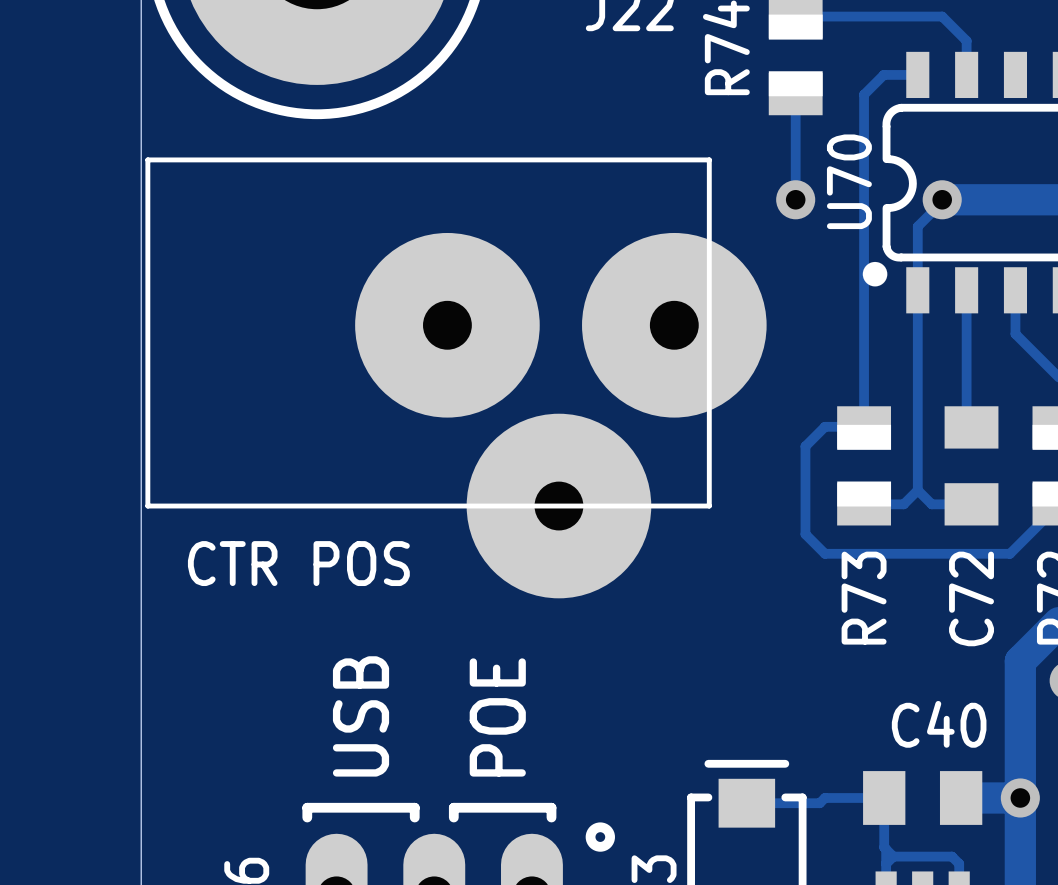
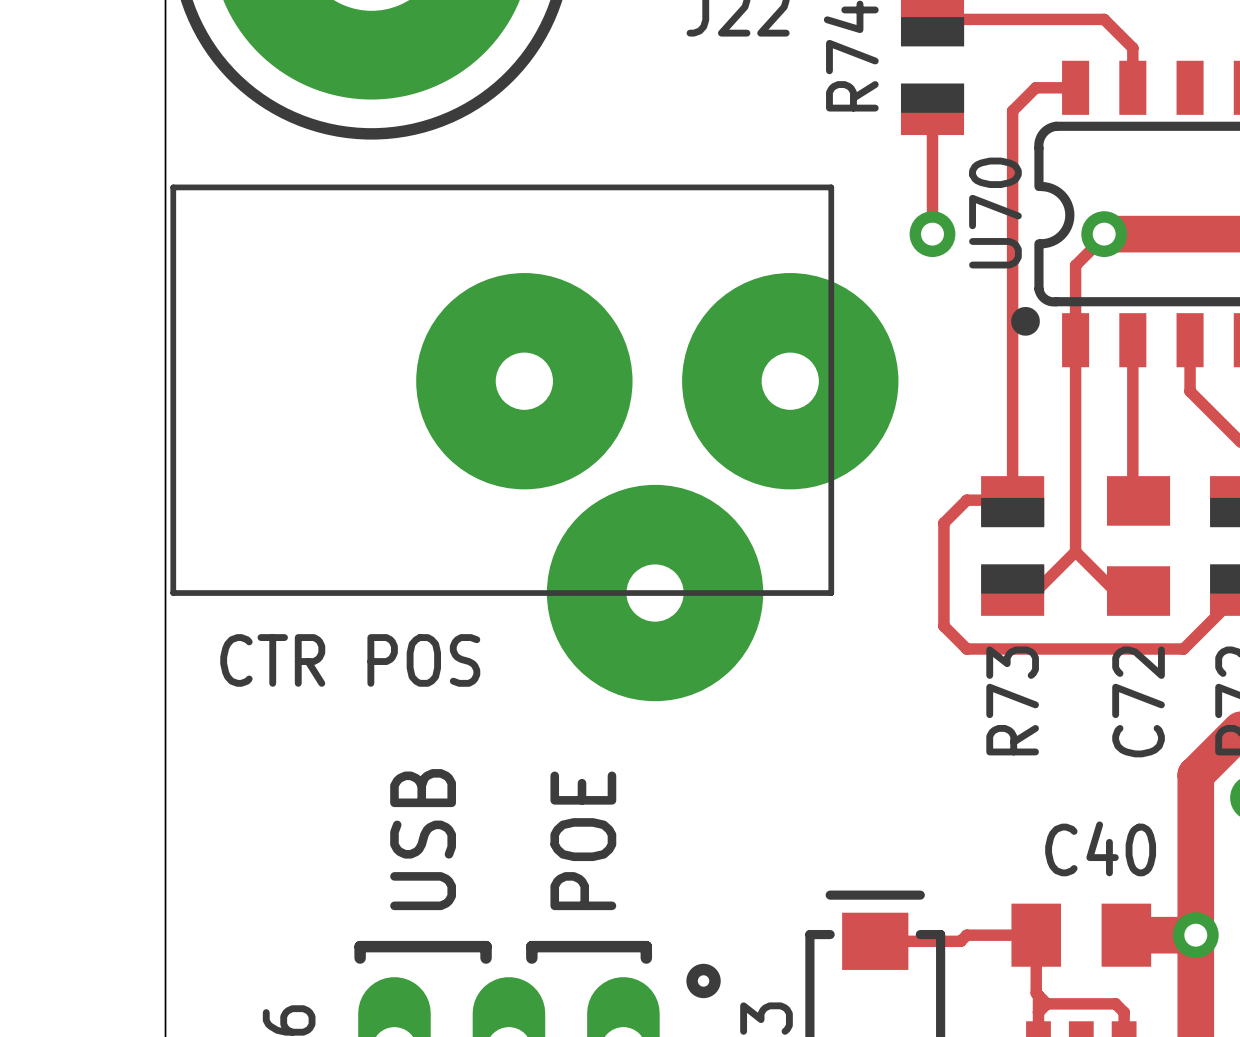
track: (917, 470) (917, 490) -> none
track: (917, 490) (903, 504) (884, 504) -> (1114, 591) (1075, 551) (1036, 591)
track: (917, 490) (931, 504) (951, 504) -> none

